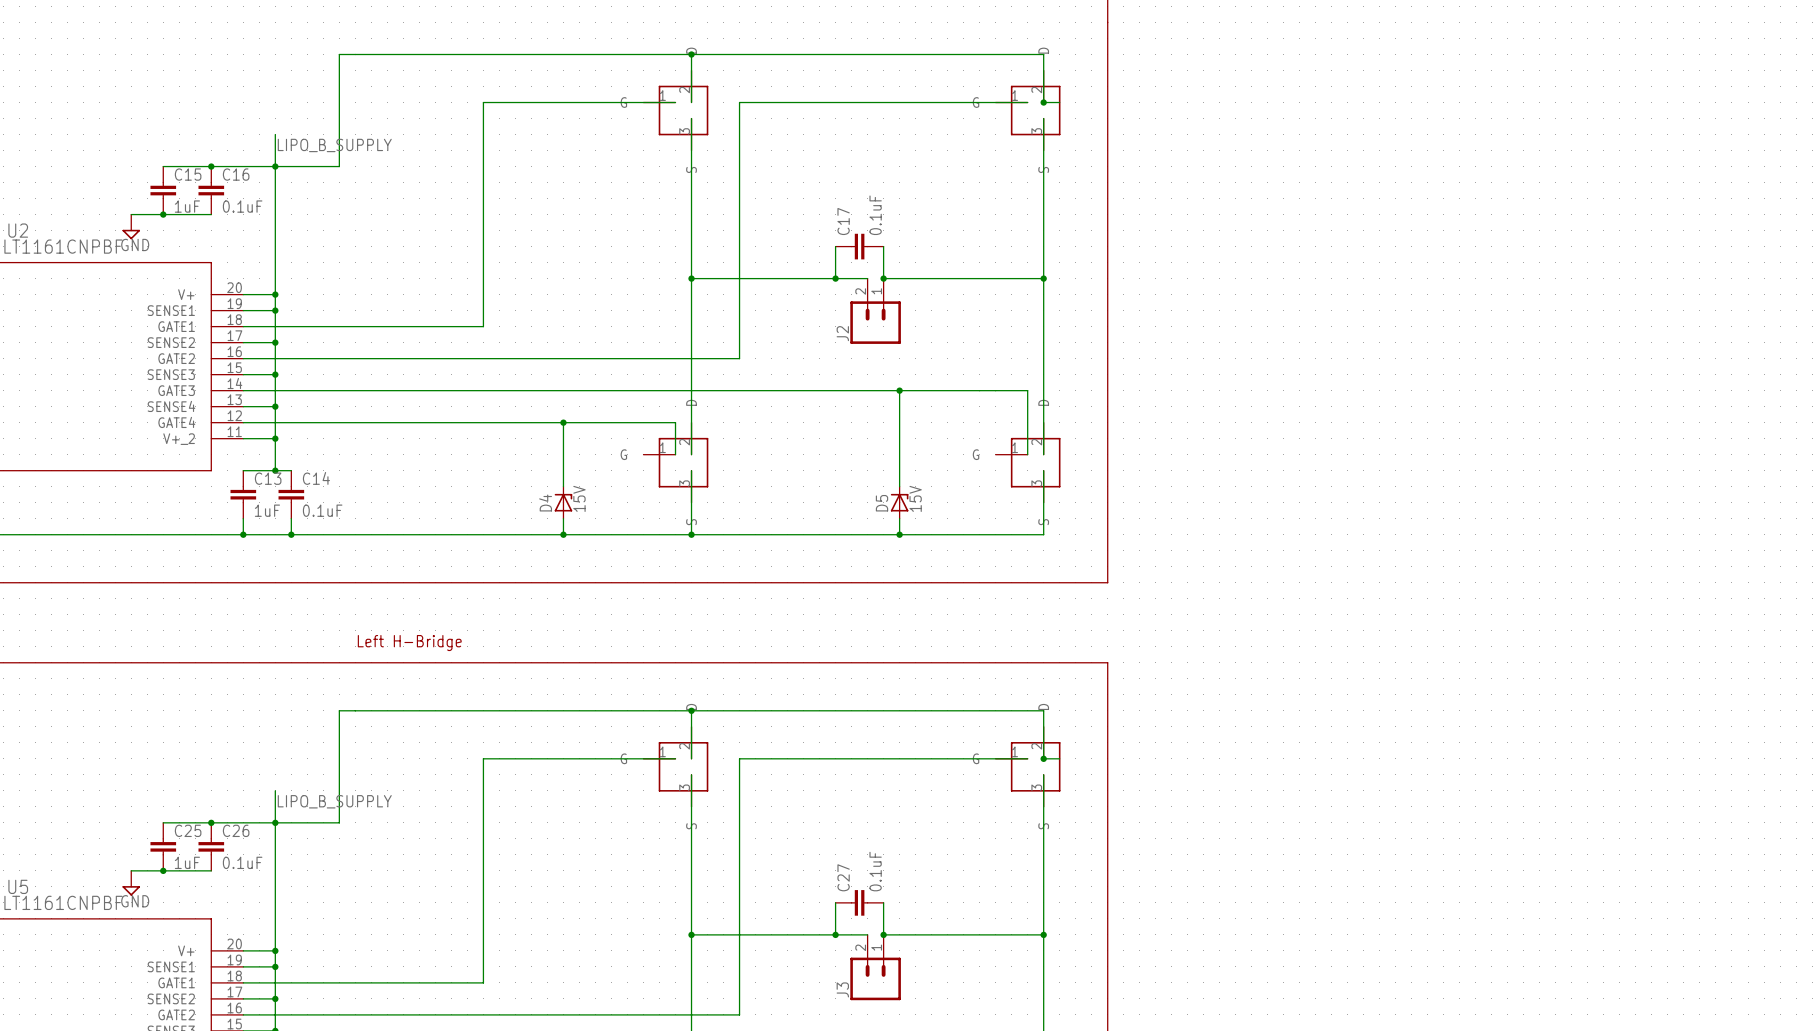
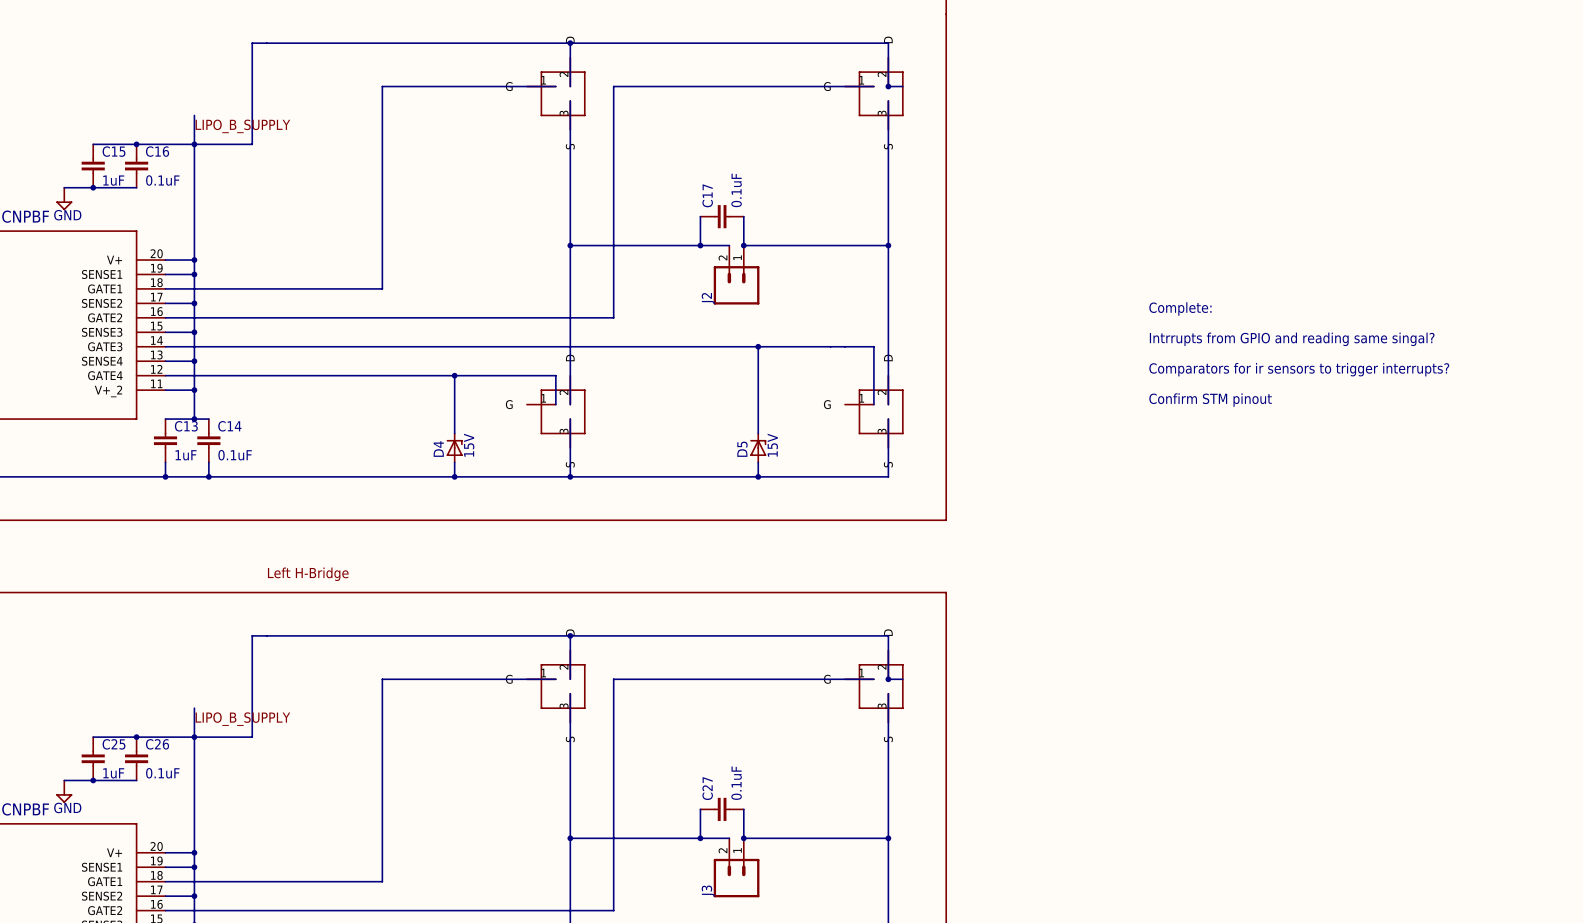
text: none -> Complete: (1180, 308)
text: none -> Intrrupts from GPIO and reading same singal? (1292, 339)
text: none -> Comparators for ir sensors to trigger interrupts? (1299, 369)
text: none -> Confirm STM pinout (1210, 400)

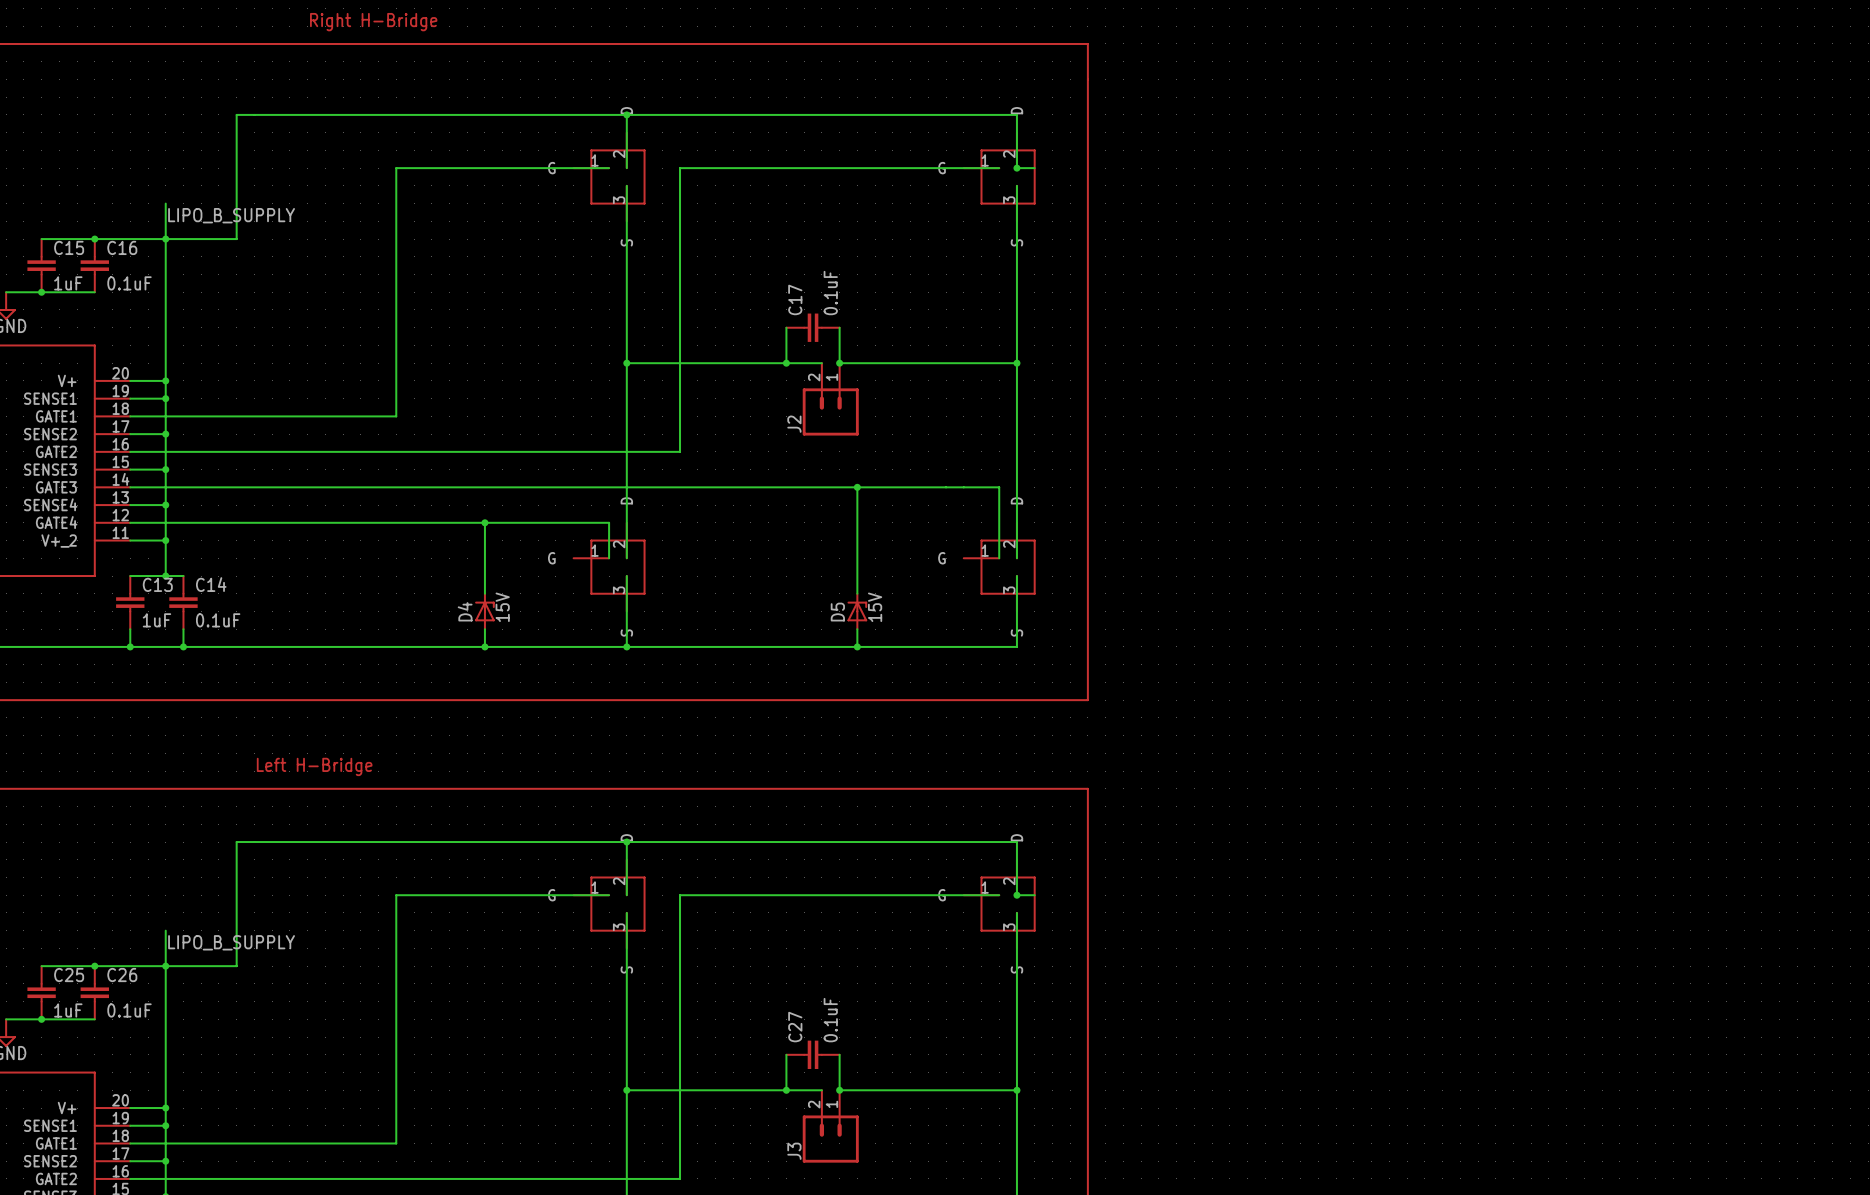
text: Complete: (1180, 308) -> none
text: Intrrupts from GPIO and reading same singal? (1292, 339) -> none
text: Comparators for ir sensors to trigger interrupts? (1299, 369) -> none
text: Confirm STM pinout (1210, 400) -> none

